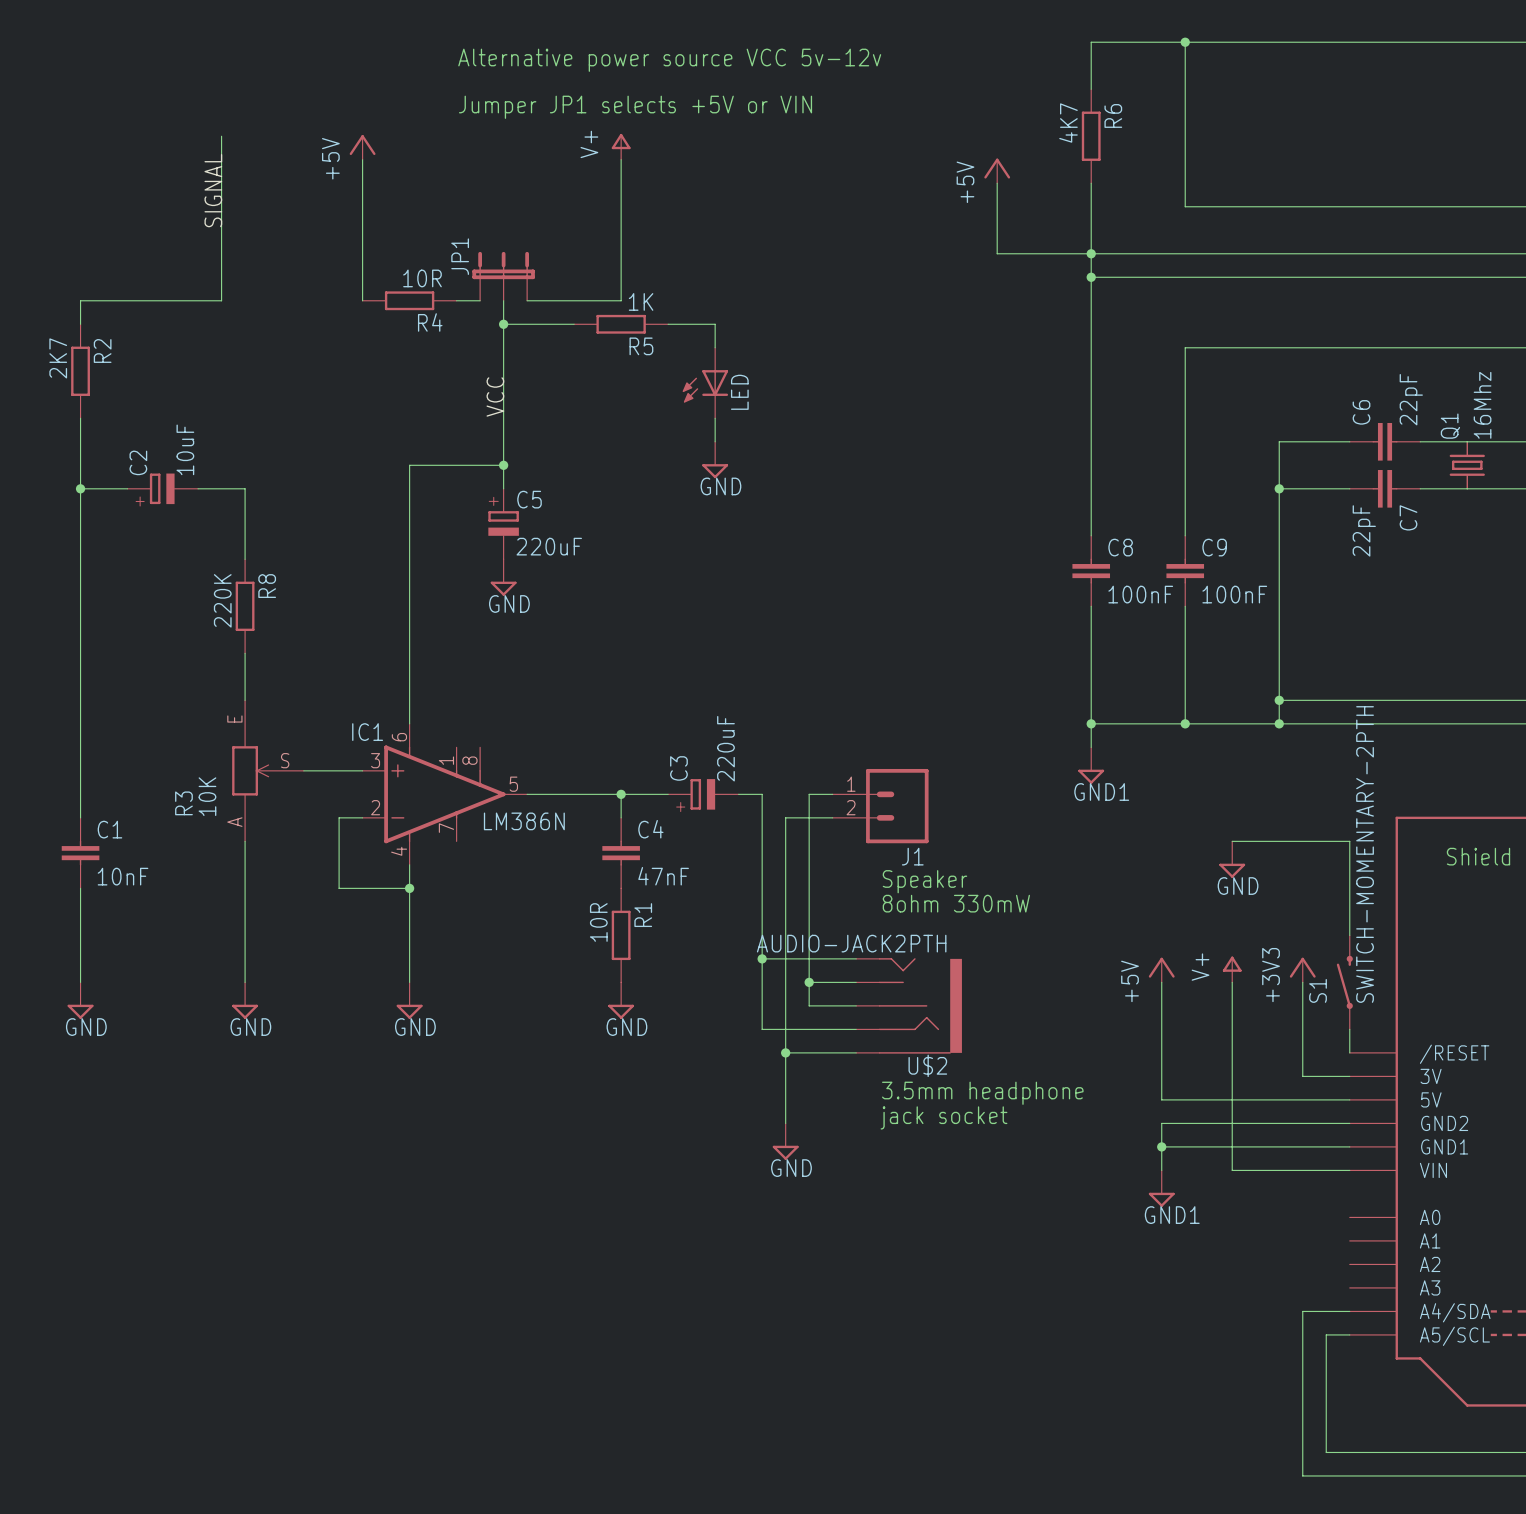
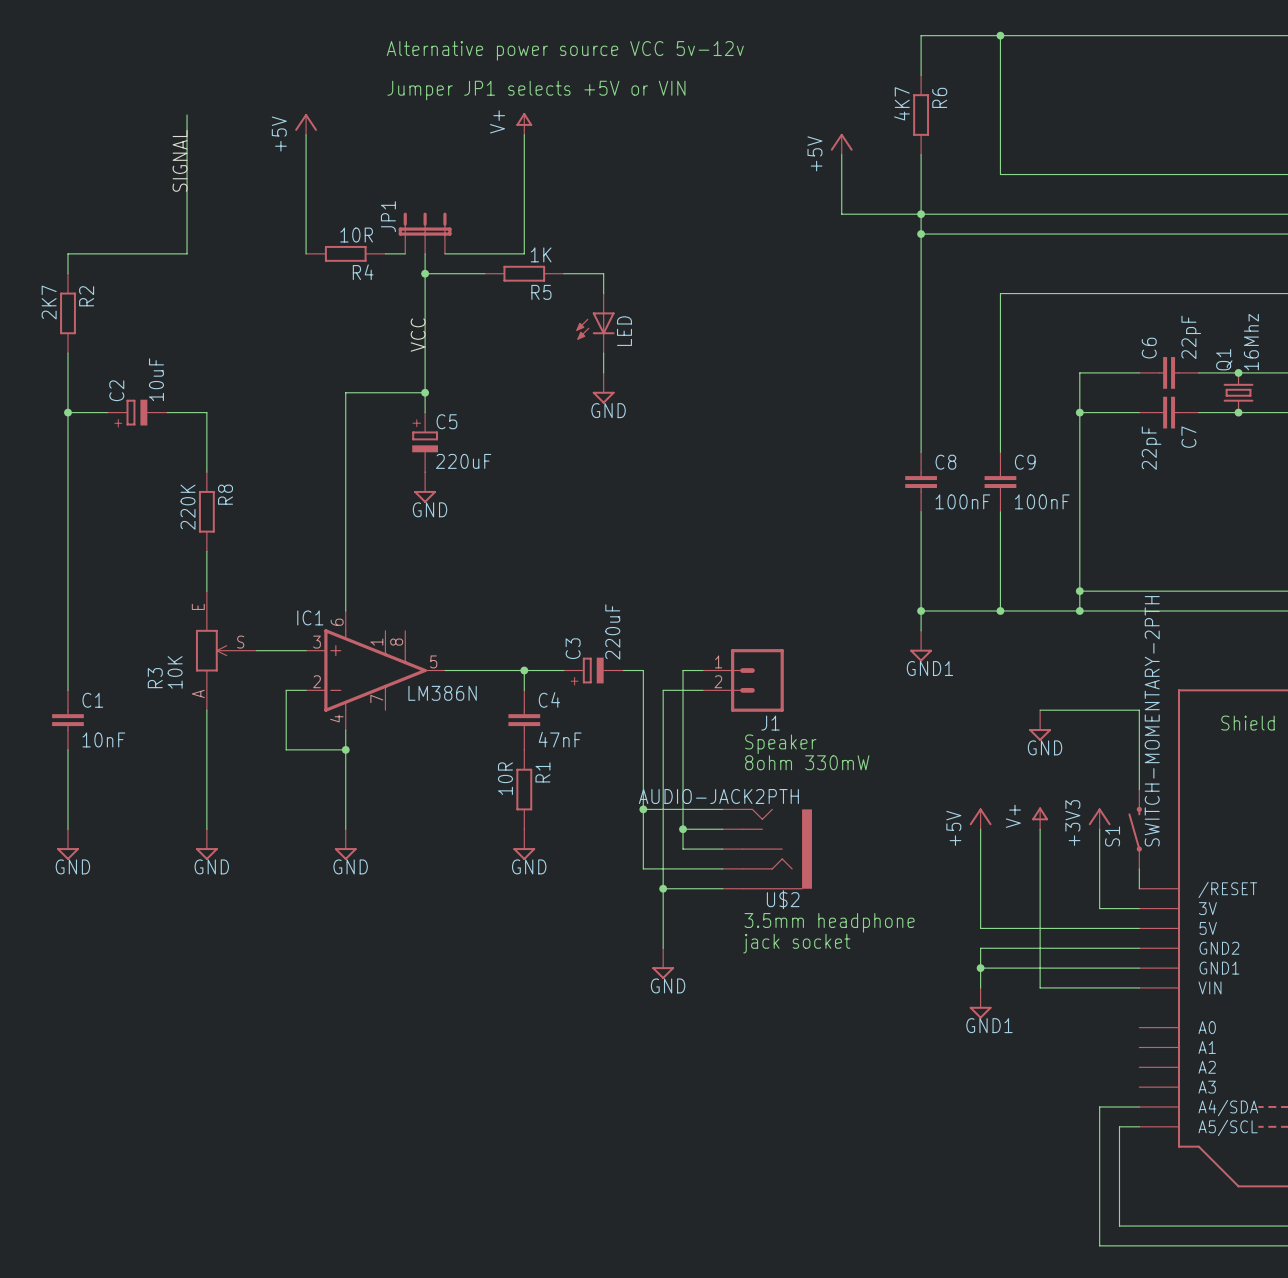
junction: none -> (1238, 372)
junction: none -> (1238, 412)

